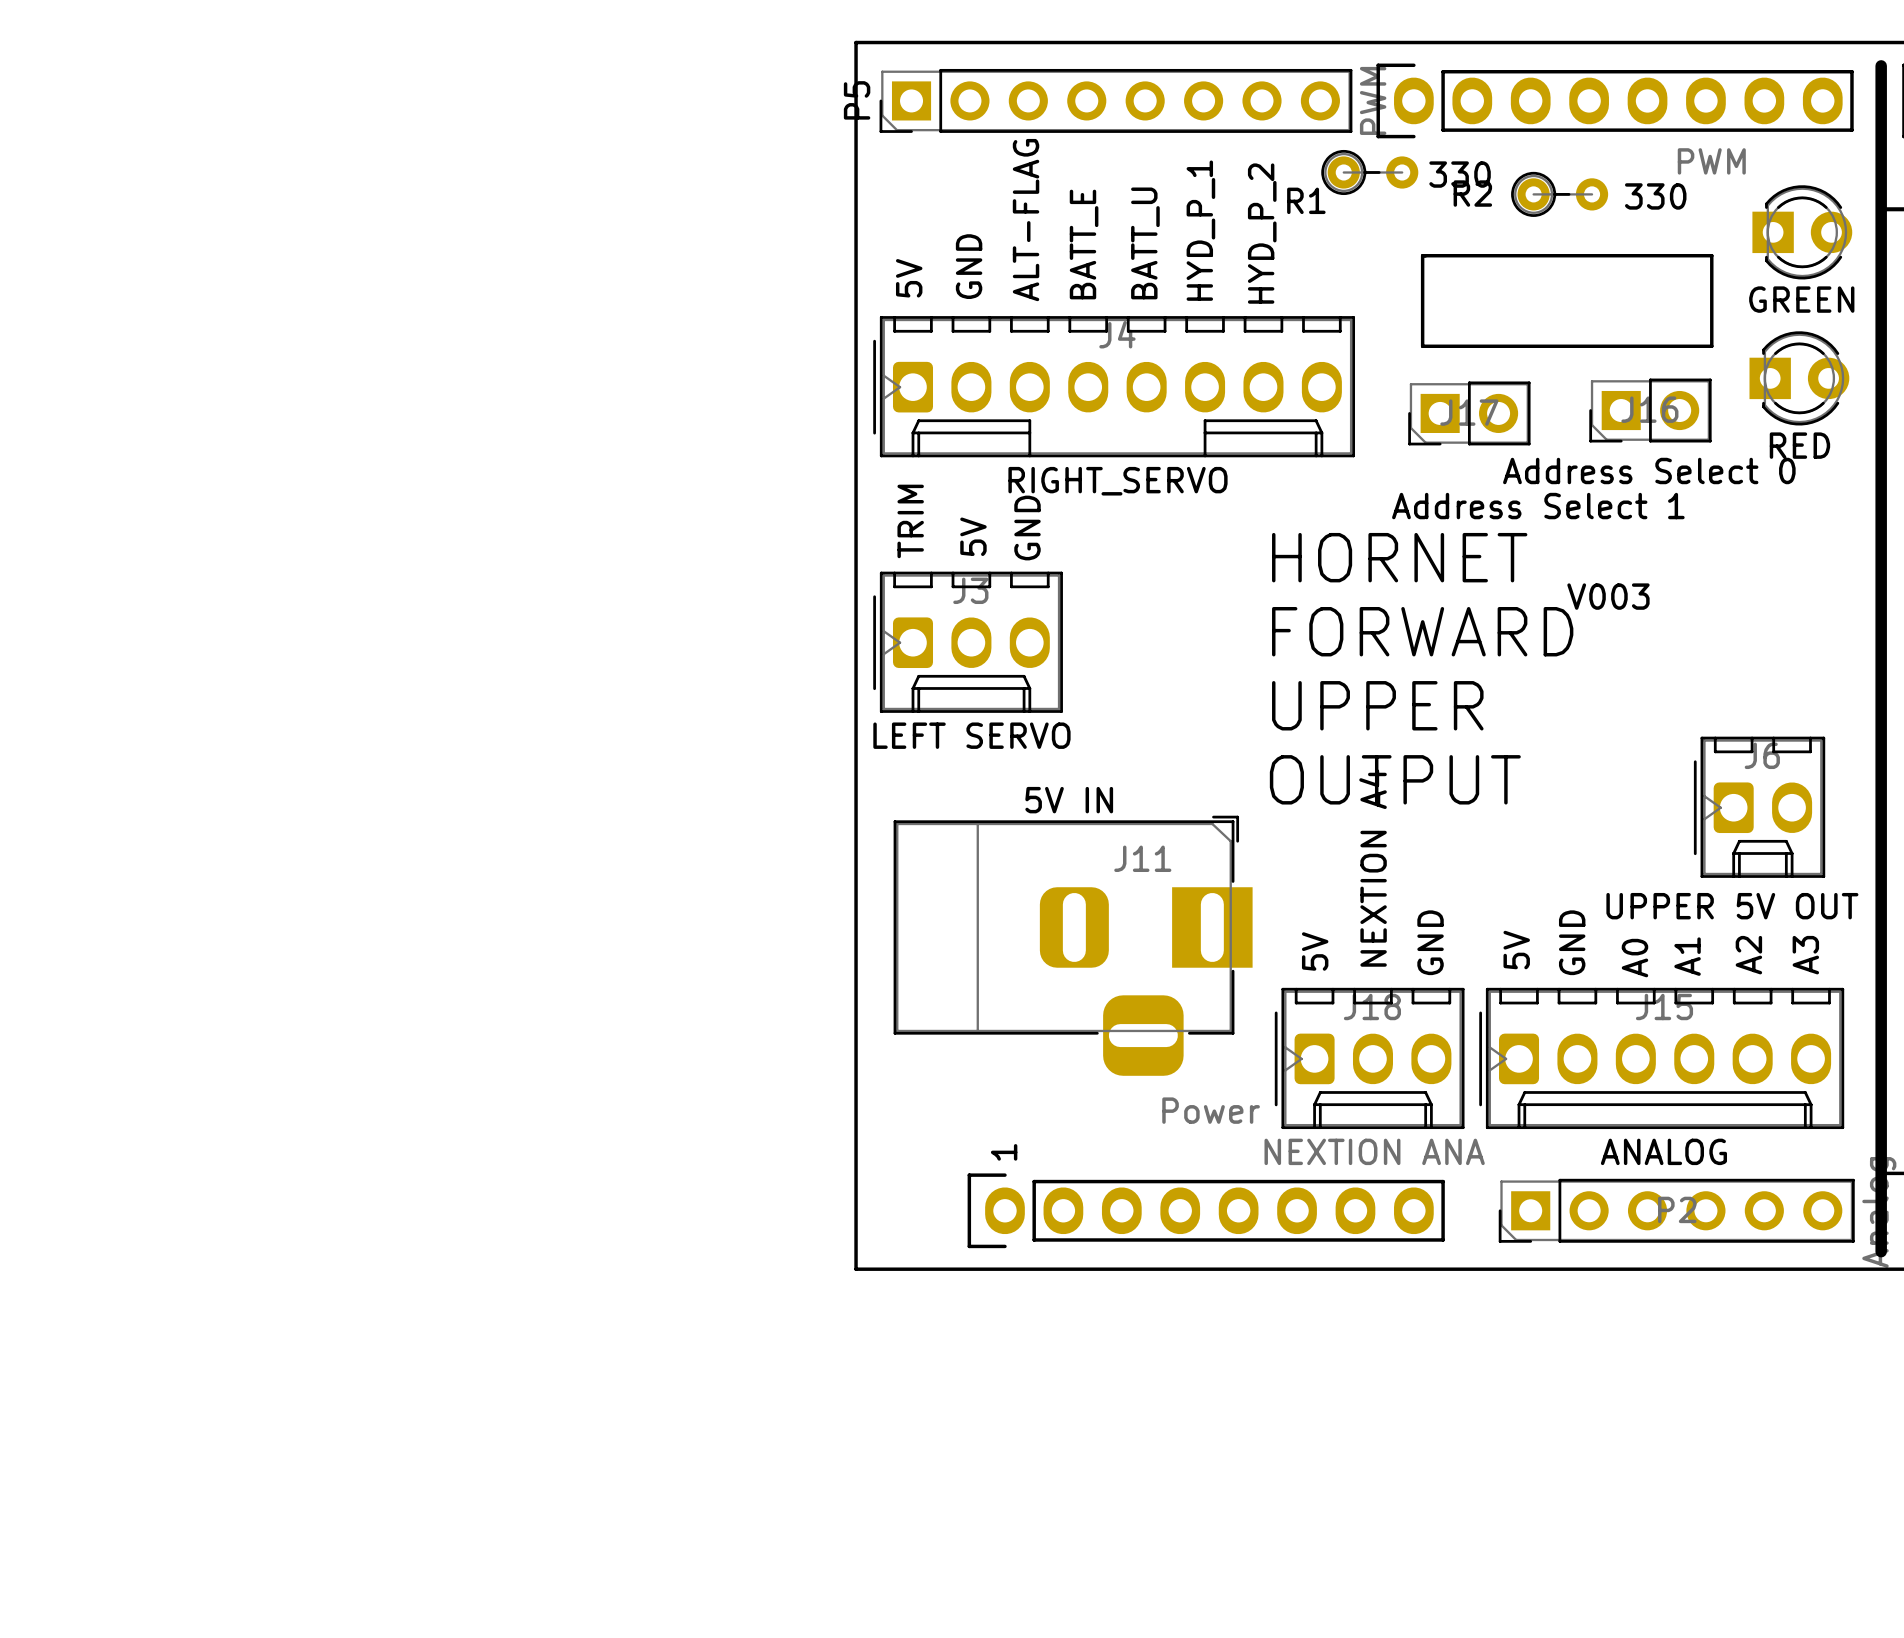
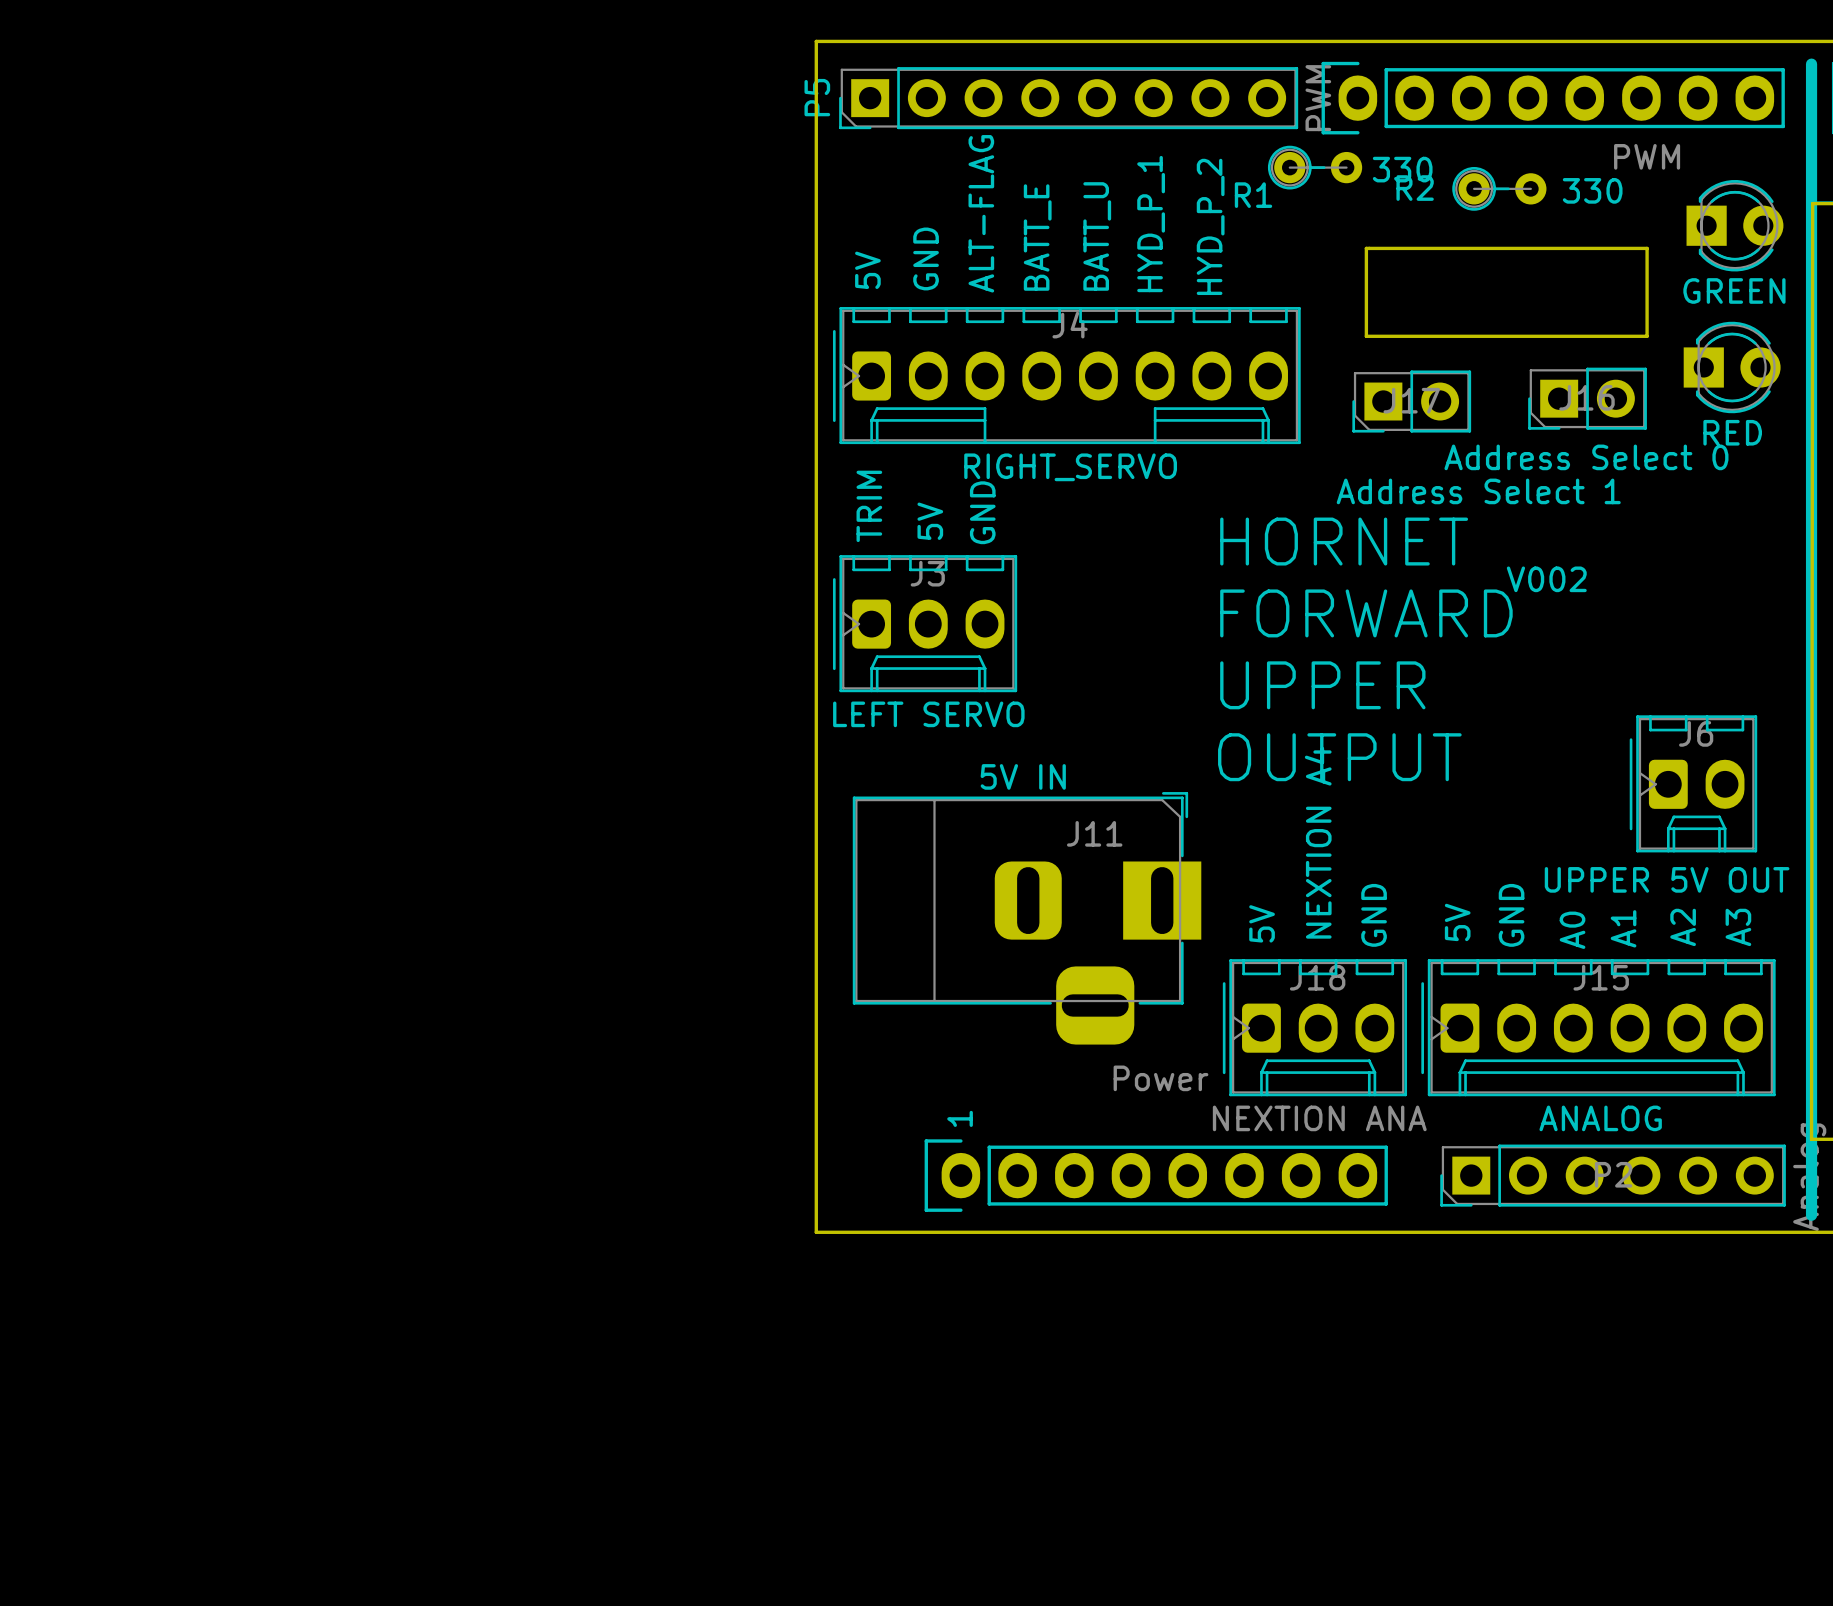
text: V003 (1608, 596) -> V002 (1546, 579)

